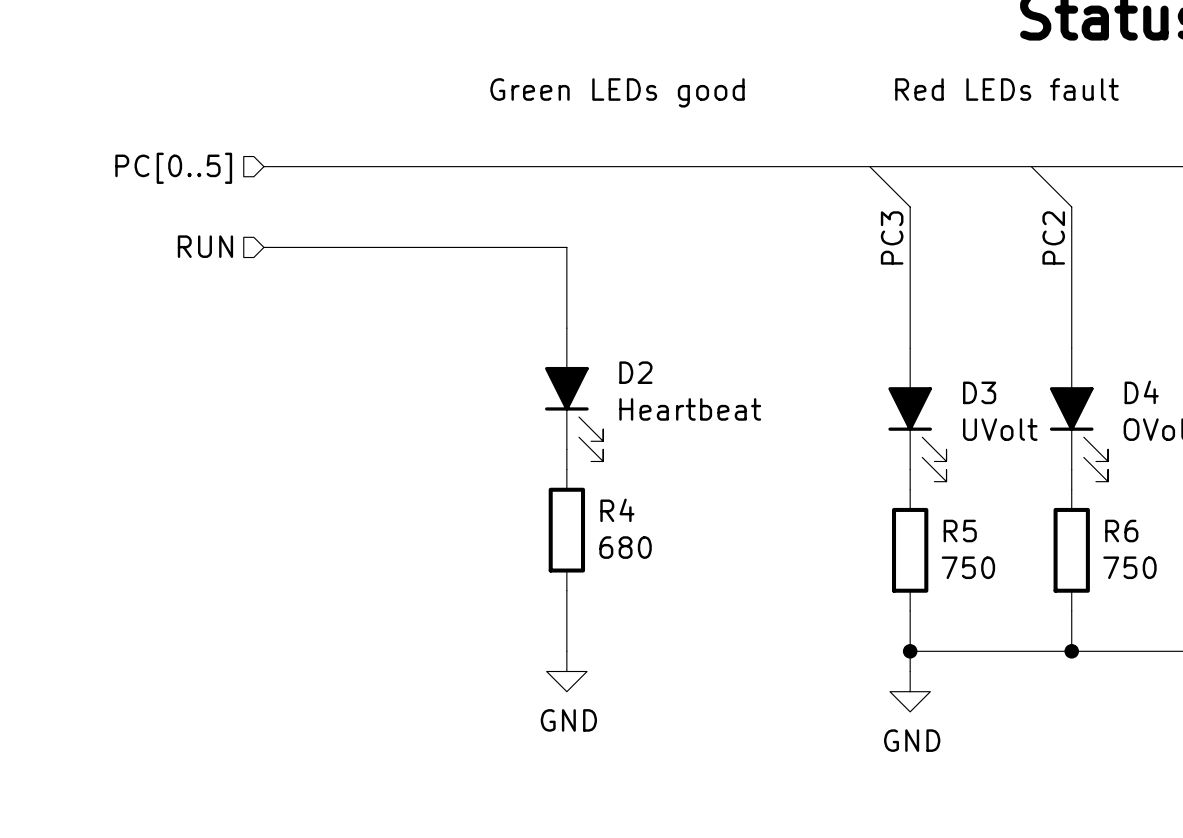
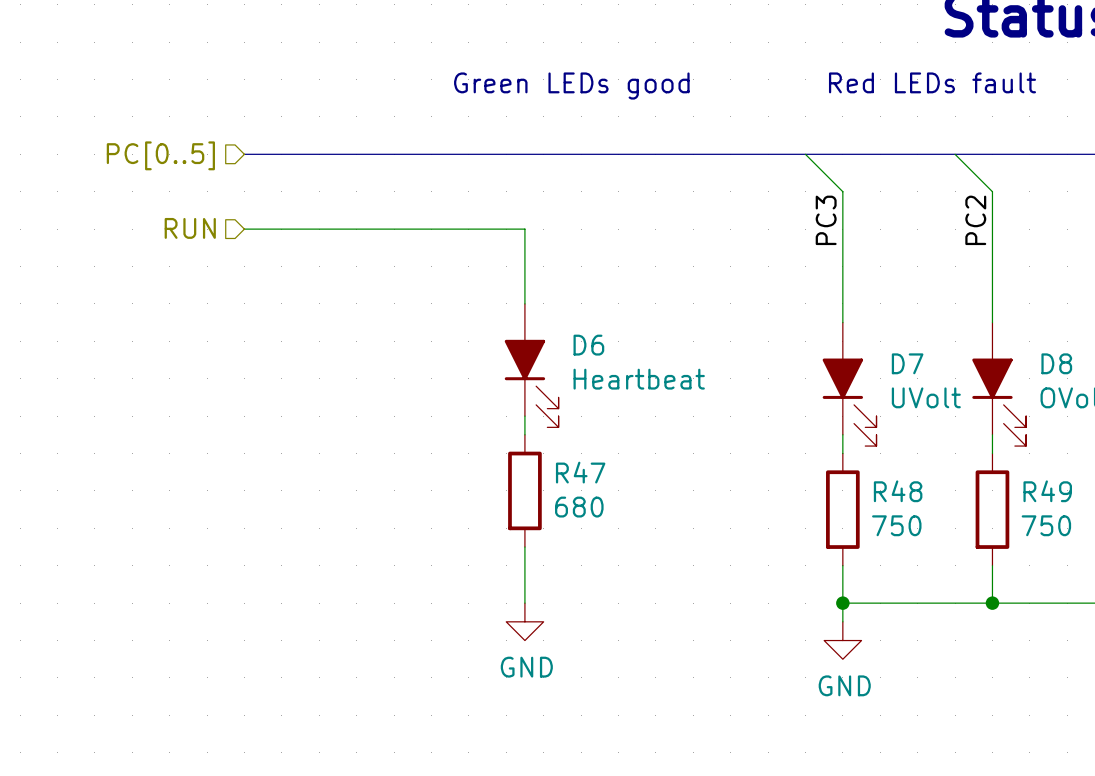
D2 name: D2 (635, 372) -> D6 (588, 345)
D3 name: D3 (979, 392) -> D7 (907, 363)
D4 name: D4 (1141, 392) -> D8 (1056, 363)
R4 name: R4 (617, 510) -> R47 (580, 472)
R5 name: R5 (960, 531) -> R48 (898, 491)
R6 name: R6 (1121, 531) -> R49 (1047, 491)

